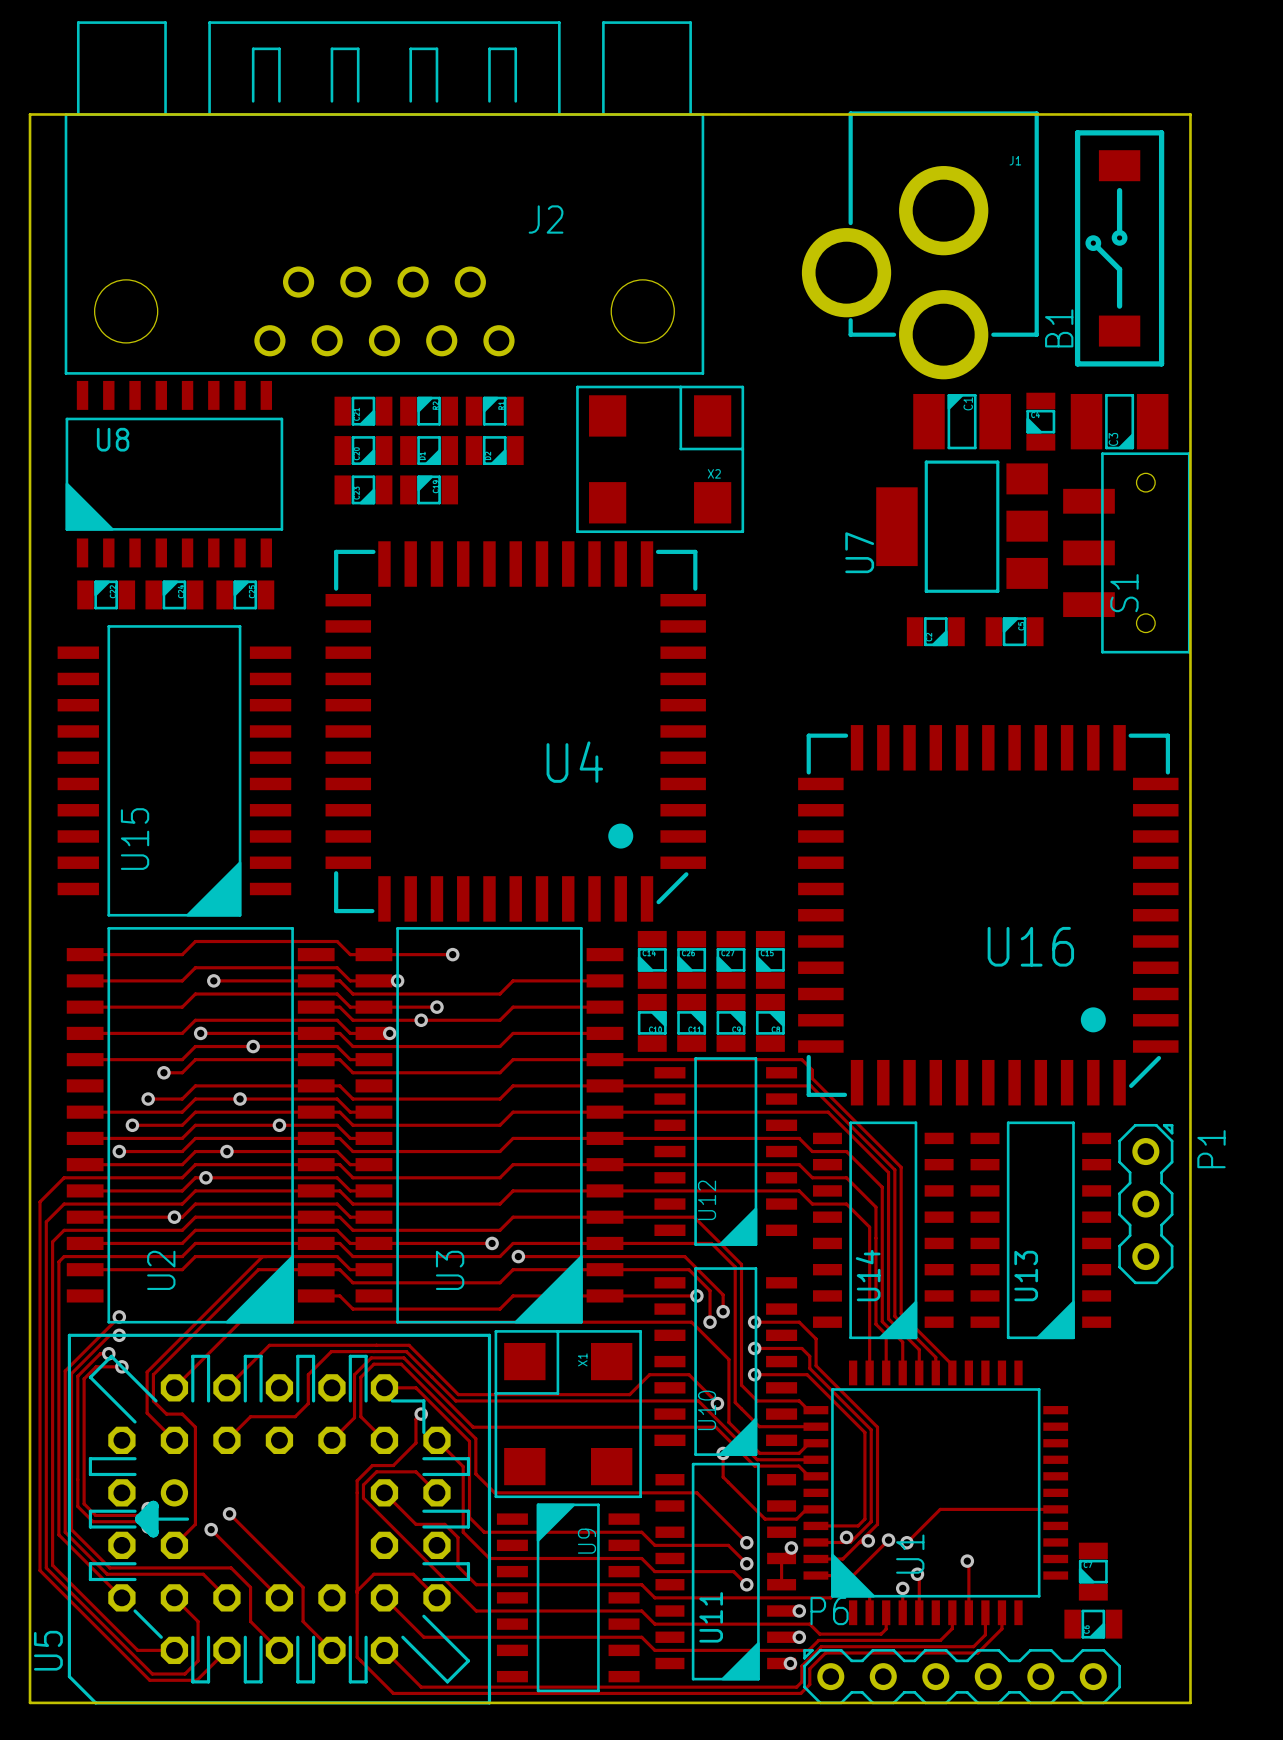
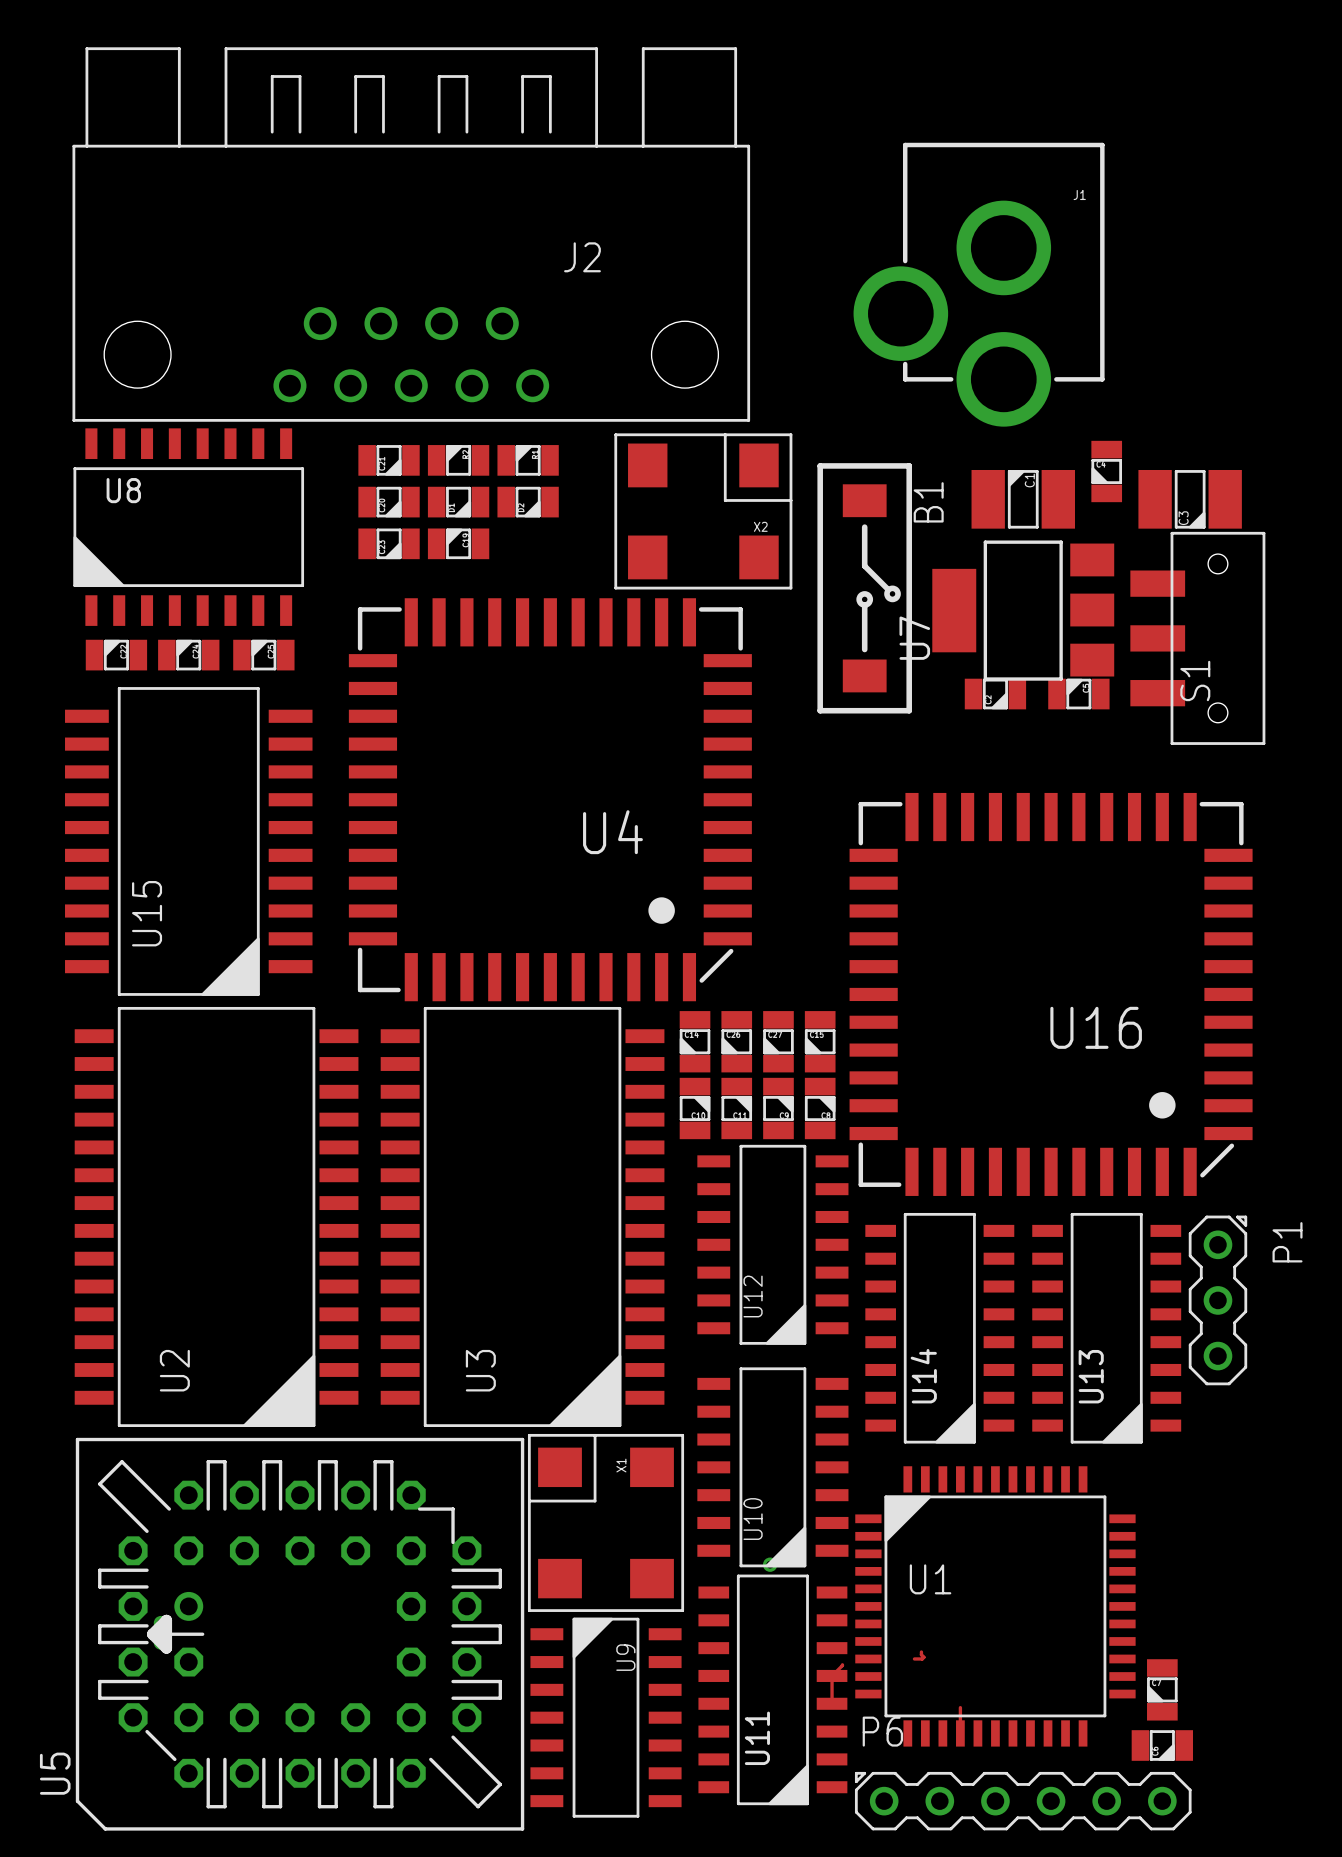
board edge: (30, 114) (1190, 114) (1190, 1702) (30, 1702) (30, 114) -> none
B1 rotation: 0° (1119, 248) -> 180° (864, 588)
B1 position: (1119, 248) -> (864, 588)
C1 position: (962, 421) -> (1023, 499)
C3 position: (1119, 421) -> (1190, 499)
U7 position: (962, 526) -> (1023, 610)
S1 position: (1126, 552) -> (1197, 638)
track: (85, 954) (182, 954) (195, 941) (337, 941) (350, 954) (452, 954) -> none
via: (452, 954) -> none
track: (85, 980) (182, 980) (195, 967) (337, 967) (350, 980) (397, 980) -> none
track: (213, 980) (339, 980) (352, 994) (499, 994) (513, 980) (605, 980) -> none
via: (213, 980) -> none
via: (397, 980) -> none
track: (85, 1007) (182, 1007) (195, 994) (337, 994) (350, 1007) (436, 1007) -> none
track: (316, 1007) (339, 1007) (352, 1020) (499, 1020) (513, 1007) (605, 1007) -> none
via: (436, 1007) -> none
via: (421, 1020) -> none
track: (85, 1033) (182, 1033) (195, 1020) (337, 1020) (350, 1033) (389, 1033) -> none
track: (200, 1033) (339, 1033) (352, 1046) (499, 1046) (513, 1033) (605, 1033) -> none
via: (200, 1033) -> none
via: (389, 1033) -> none
via: (253, 1046) -> none
track: (85, 1059) (182, 1059) (195, 1046) (337, 1046) (350, 1059) (373, 1059) -> none
track: (163, 1072) (182, 1072) (195, 1059) (339, 1059) (352, 1072) (499, 1072) (513, 1059) (801, 1059) (812, 1070) (812, 1078) (901, 1167) (901, 1313) (952, 1364) (952, 1372) -> none
via: (163, 1072) -> none
track: (148, 1099) (182, 1099) (195, 1085) (339, 1085) (352, 1099) (499, 1099) (513, 1085) (810, 1085) (894, 1169) (894, 1316) (935, 1357) (935, 1372) -> none
via: (148, 1099) -> none
via: (240, 1099) -> none
track: (85, 1112) (182, 1112) (195, 1099) (337, 1099) (350, 1112) (373, 1112) -> none
track: (132, 1125) (182, 1125) (195, 1112) (339, 1112) (352, 1125) (499, 1125) (513, 1112) (828, 1112) (888, 1172) (888, 1319) (919, 1349) (919, 1372) -> none
via: (132, 1125) -> none
via: (279, 1125) -> none
track: (85, 1138) (182, 1138) (195, 1125) (337, 1125) (350, 1138) (373, 1138) -> none
track: (119, 1151) (182, 1151) (195, 1138) (339, 1138) (352, 1151) (499, 1151) (513, 1138) (799, 1138) (812, 1151) (846, 1151) (882, 1187) (882, 1321) (902, 1342) (902, 1372) -> none
via: (119, 1151) -> none
via: (226, 1151) -> none
track: (85, 1164) (182, 1164) (195, 1151) (337, 1151) (350, 1164) (373, 1164) -> none
via: (205, 1177) -> none
track: (85, 1190) (182, 1190) (195, 1177) (337, 1177) (350, 1190) (373, 1190) -> none
track: (85, 1217) (182, 1217) (195, 1204) (337, 1204) (350, 1217) (373, 1217) -> none
via: (174, 1217) -> none
track: (85, 1243) (182, 1243) (195, 1230) (337, 1230) (350, 1243) (492, 1243) -> none
via: (492, 1243) -> none
track: (262, 1256) (147, 1372) (147, 1413) (174, 1440) -> none
track: (518, 1256) (684, 1256) (723, 1294) (723, 1311) -> none
via: (518, 1256) -> none
track: (85, 1269) (182, 1269) (195, 1256) (337, 1256) (350, 1269) (373, 1269) -> none
track: (316, 1295) (339, 1295) (352, 1309) (499, 1309) (513, 1295) (696, 1295) -> none
via: (696, 1295) -> none
via: (723, 1311) -> none
track: (119, 1316) (65, 1371) (65, 1532) (107, 1574) (203, 1574) (226, 1597) -> none
via: (119, 1316) -> none
track: (710, 1322) (710, 1290) (689, 1269) (513, 1269) (499, 1282) (352, 1282) (339, 1269) (258, 1269) (153, 1374) (153, 1400) (166, 1414) (182, 1414) (195, 1427) (195, 1524) (174, 1545) -> none
via: (710, 1322) -> none
track: (754, 1322) (799, 1322) (816, 1339) (816, 1365) (877, 1427) (877, 1524) (842, 1559) (815, 1559) -> none
via: (754, 1322) -> none
track: (119, 1335) (109, 1335) (71, 1373) (71, 1529) (109, 1567) (231, 1567) (250, 1587) (250, 1621) (279, 1650) -> none
via: (119, 1335) -> none
track: (754, 1348) (801, 1348) (809, 1356) (809, 1368) (871, 1429) (871, 1521) (850, 1542) (815, 1542) -> none
via: (754, 1348) -> none
track: (108, 1353) (100, 1353) (77, 1376) (77, 1506) (93, 1521) (142, 1521) (148, 1526) -> none
via: (108, 1353) -> none
track: (121, 1366) (96, 1366) (84, 1378) (84, 1503) (95, 1515) (141, 1515) (148, 1508) -> none
via: (121, 1366) -> none
track: (869, 1372) (869, 1227) (846, 1204) (812, 1204) (799, 1190) (513, 1190) (499, 1204) (352, 1204) (339, 1190) (195, 1190) (182, 1204) (64, 1204) (46, 1221) (46, 1567) (152, 1674) (184, 1674) (198, 1660) (198, 1621) (174, 1597) -> none
track: (886, 1372) (886, 1334) (875, 1324) (875, 1207) (846, 1177) (812, 1177) (799, 1164) (513, 1164) (499, 1177) (352, 1177) (339, 1164) (195, 1164) (182, 1177) (64, 1177) (40, 1201) (40, 1570) (149, 1680) (197, 1680) (226, 1650) -> none
track: (754, 1374) (807, 1374) (864, 1432) (864, 1519) (858, 1525) (815, 1525) -> none
via: (754, 1374) -> none
track: (174, 1387) (240, 1322) (691, 1322) (728, 1359) (728, 1422) (759, 1453) (799, 1453) (809, 1443) (815, 1443) -> none
track: (226, 1387) (269, 1345) (409, 1345) (458, 1394) (629, 1394) (649, 1374) (689, 1374) (717, 1403) -> none
track: (384, 1387) (415, 1387) (469, 1441) (469, 1517) (484, 1532) (641, 1532) (654, 1545) (728, 1545) (746, 1563) -> none
via: (717, 1403) -> none
track: (815, 1410) (808, 1410) (799, 1400) (757, 1400) (741, 1385) (741, 1264) (694, 1217) (513, 1217) (499, 1230) (352, 1230) (339, 1217) (195, 1217) (182, 1230) (64, 1230) (52, 1241) (52, 1565) (137, 1650) (174, 1650) -> none
track: (421, 1414) (415, 1419) (415, 1442) (393, 1465) (372, 1465) (357, 1480) (357, 1657) (393, 1693) (800, 1693) (809, 1684) (809, 1668) (825, 1653) (977, 1653) (1001, 1628) (1001, 1612) -> none
via: (421, 1414) -> none
track: (815, 1426) (759, 1426) (735, 1402) (735, 1267) (711, 1243) (513, 1243) (499, 1256) (352, 1256) (339, 1243) (195, 1243) (182, 1256) (64, 1256) (58, 1261) (58, 1534) (121, 1597) -> none
track: (226, 1440) (250, 1416) (295, 1416) (308, 1403) (308, 1374) (331, 1351) (406, 1351) (455, 1400) (698, 1400) (757, 1459) (815, 1459) -> none
track: (331, 1440) (354, 1417) (354, 1374) (371, 1357) (403, 1357) (473, 1427) (715, 1427) (754, 1466) (798, 1466) (809, 1476) (815, 1476) -> none
track: (384, 1440) (360, 1416) (360, 1377) (373, 1364) (401, 1364) (475, 1438) (475, 1473) (494, 1492) (696, 1492) (746, 1542) -> none
track: (436, 1440) (463, 1466) (463, 1532) (489, 1558) (641, 1558) (654, 1571) (733, 1571) (746, 1584) -> none
track: (723, 1453) (723, 1477) (765, 1519) (796, 1519) (806, 1509) (815, 1509) -> none
track: (384, 1492) (415, 1524) (444, 1524) (457, 1537) (457, 1566) (476, 1584) (641, 1584) (654, 1597) (830, 1597) (838, 1589) (864, 1589) (869, 1594) (869, 1612) -> none
track: (436, 1492) (415, 1471) (376, 1471) (363, 1484) (363, 1498) (476, 1611) (641, 1611) (654, 1624) (809, 1624) (819, 1634) (881, 1634) (886, 1629) (886, 1612) -> none
U1 rotation: 0° (935, 1492) -> 90° clockwise (995, 1606)
track: (1055, 1509) (940, 1509) (906, 1542) -> none
track: (229, 1513) (303, 1587) (303, 1621) (331, 1650) -> none
via: (229, 1513) -> none
track: (211, 1529) (279, 1597) -> none
via: (211, 1529) -> none
via: (846, 1537) -> none
via: (868, 1540) -> none
track: (888, 1540) (853, 1575) (815, 1575) -> none
via: (888, 1540) -> none
via: (746, 1542) -> none
via: (906, 1542) -> none
via: (791, 1547) -> none
track: (967, 1561) (968, 1562) (968, 1612) -> none
via: (967, 1561) -> none
via: (746, 1563) -> none
track: (917, 1574) (919, 1576) (919, 1612) -> none
via: (917, 1574) -> none
via: (746, 1584) -> none
via: (902, 1588) -> none
track: (357, 1591) (373, 1574) (413, 1574) (436, 1597) -> none
track: (384, 1597) (423, 1637) (641, 1637) (654, 1650) (808, 1650) (818, 1640) (940, 1640) (952, 1628) (952, 1612) -> none
via: (799, 1611) -> none
track: (985, 1612) (985, 1634) (973, 1646) (821, 1646) (801, 1666) (801, 1681) (796, 1687) (421, 1687) (384, 1650) -> none
via: (799, 1637) -> none
via: (790, 1663) -> none

